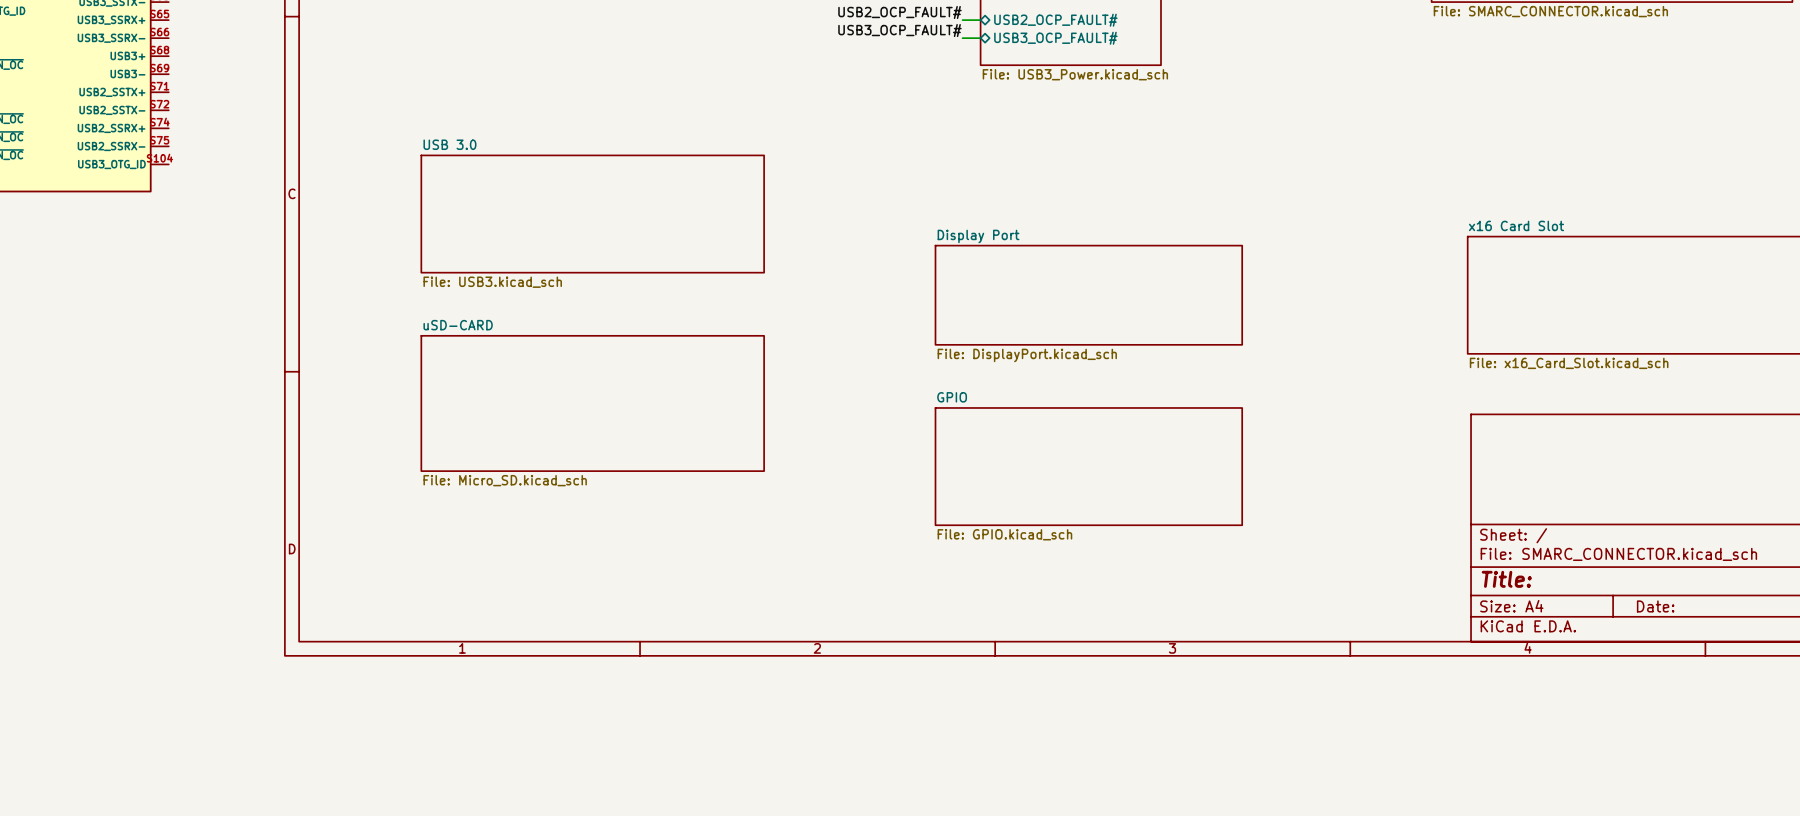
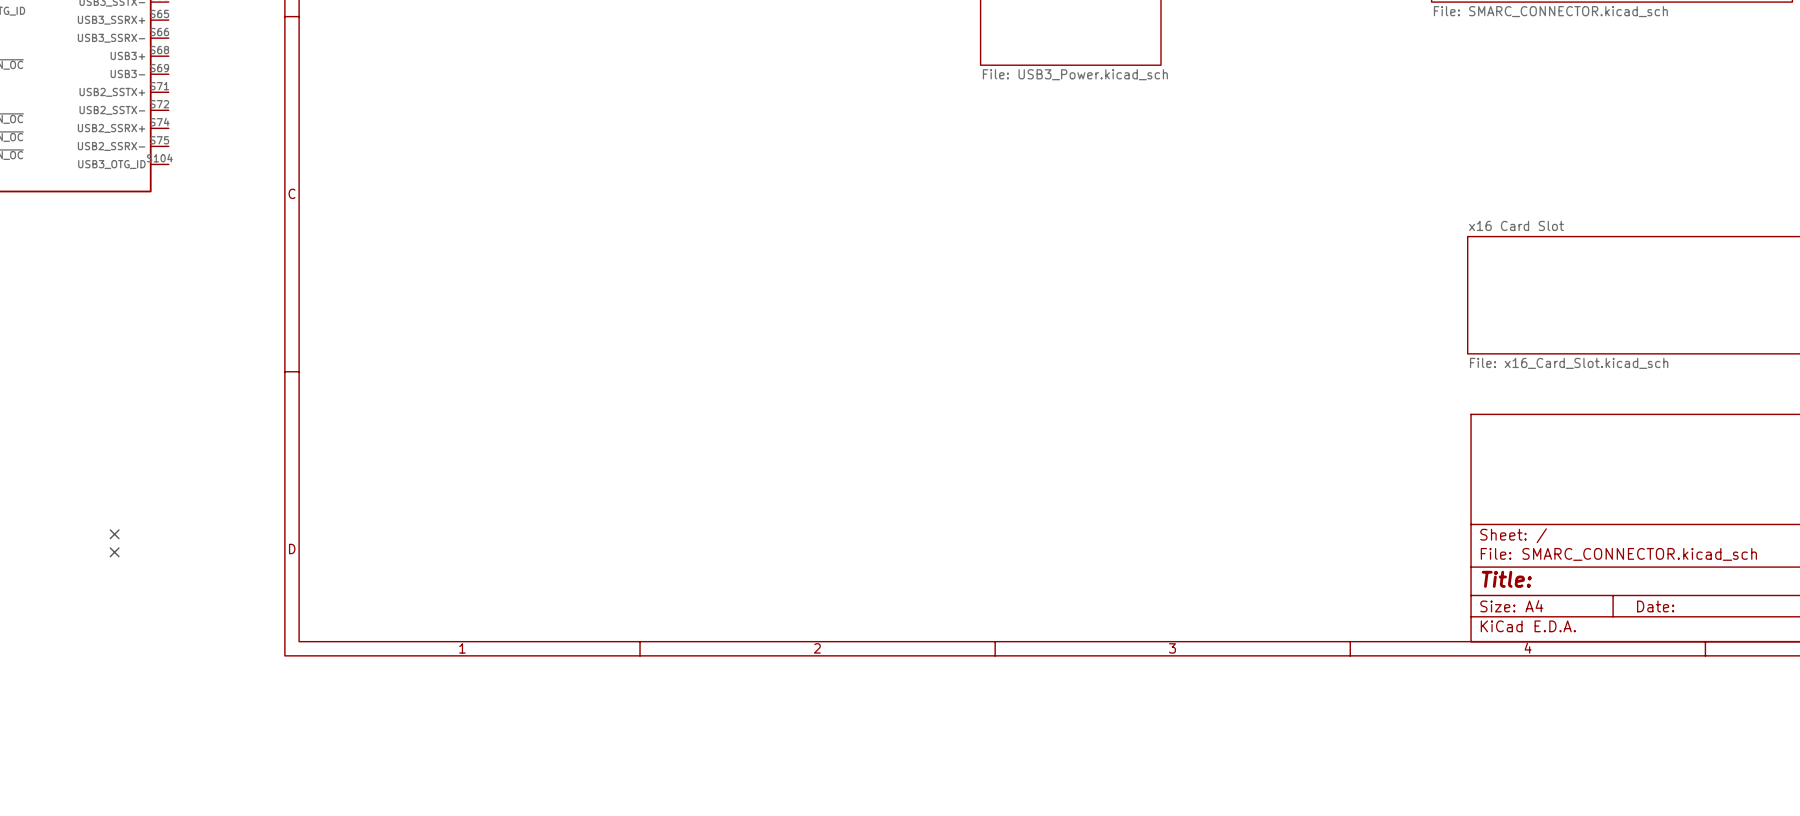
label: USB2_OCP_FAULT# (899, 12) -> none
wire: (962, 20) (980, 20) -> none
sheet pin: USB2_OCP_FAULT# (1055, 20) -> none
label: USB3_OCP_FAULT# (899, 30) -> none
wire: (962, 38) (980, 38) -> none
sheet pin: USB3_OCP_FAULT# (1055, 38) -> none
sheet USB 3.0: File: USB3.kicad_sch (592, 214) -> none
sheet Display Port: File: DisplayPort.kicad_sch (1088, 295) -> none
sheet uSD-CARD: File: Micro_SD.kicad_sch (592, 403) -> none
sheet GPIO: File: GPIO.kicad_sch (1088, 466) -> none
no-connect mark: none -> (114, 534)
no-connect mark: none -> (114, 552)

